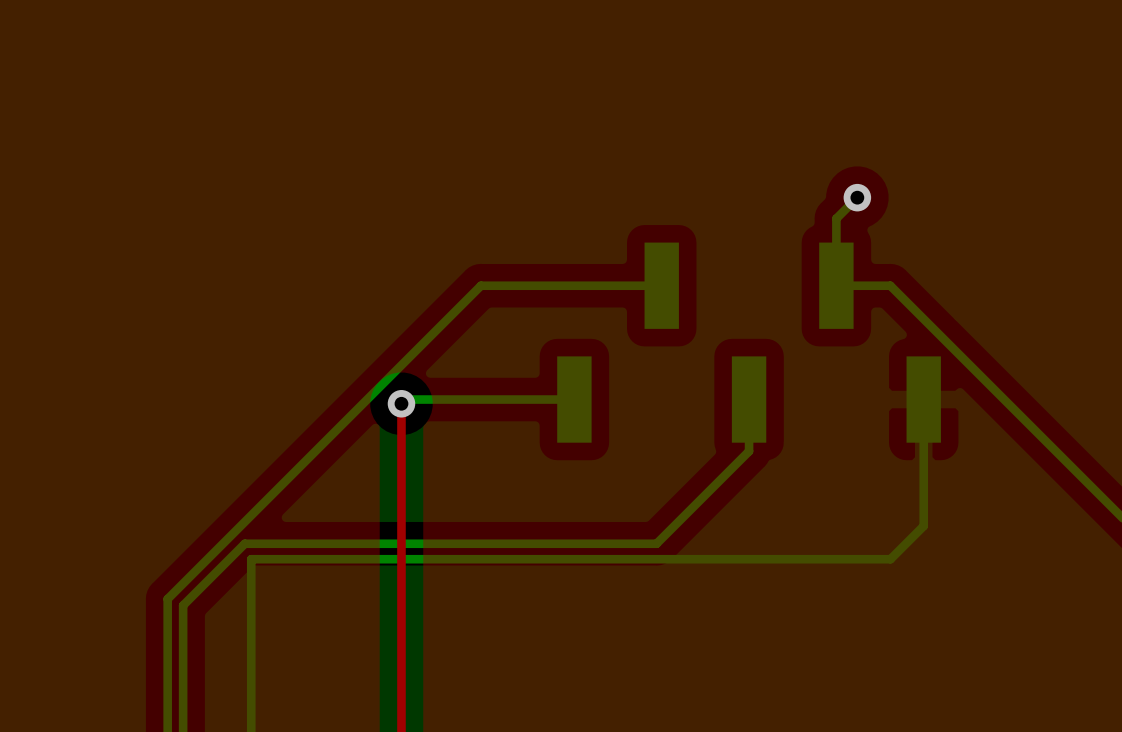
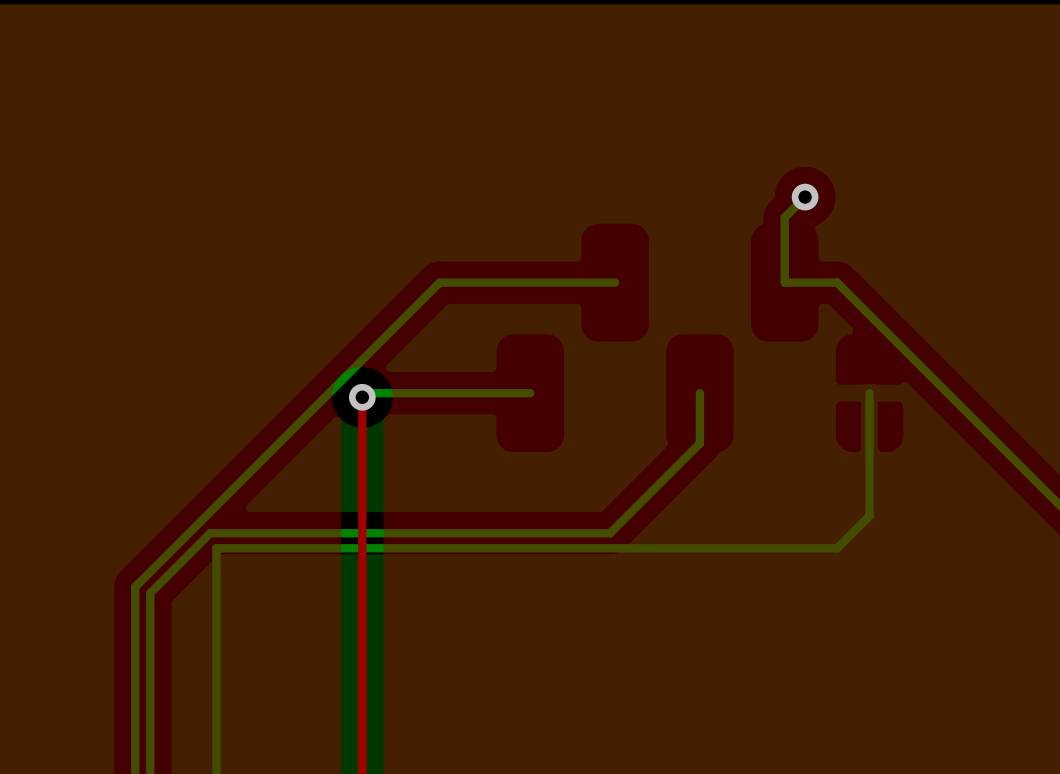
part: (749, 342) -> none

